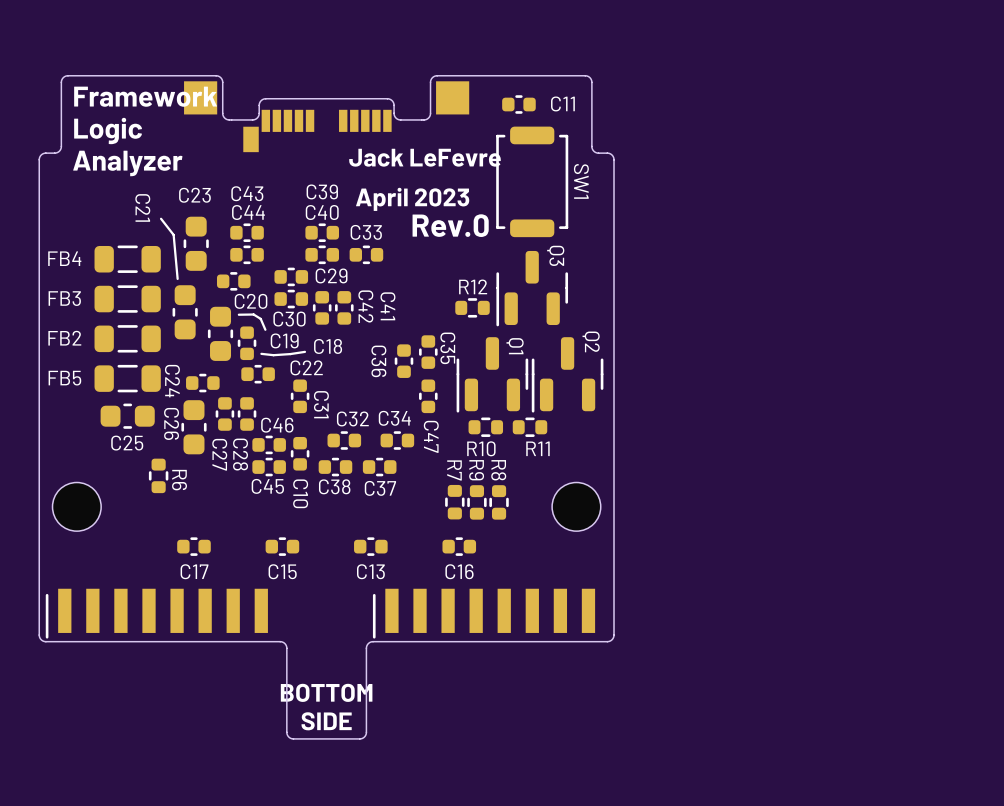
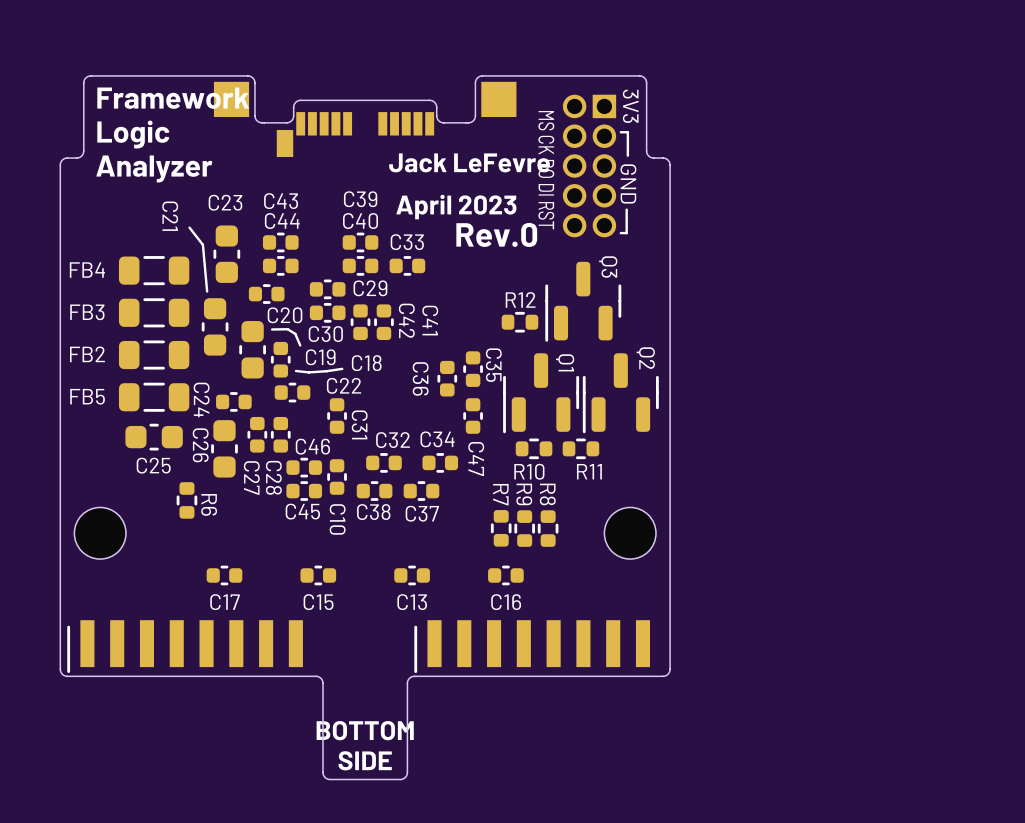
C11: (518, 104) -> none
text: none -> 3V3 (630, 106)
line: none -> (620, 132) (627, 132) (627, 155)
part: none -> (589, 166)
text: none -> MS CK DO DI RST (546, 170)
text: none -> GND (628, 183)
SW1: (532, 181) -> none
line: none -> (626, 209) (626, 233) (620, 233)

